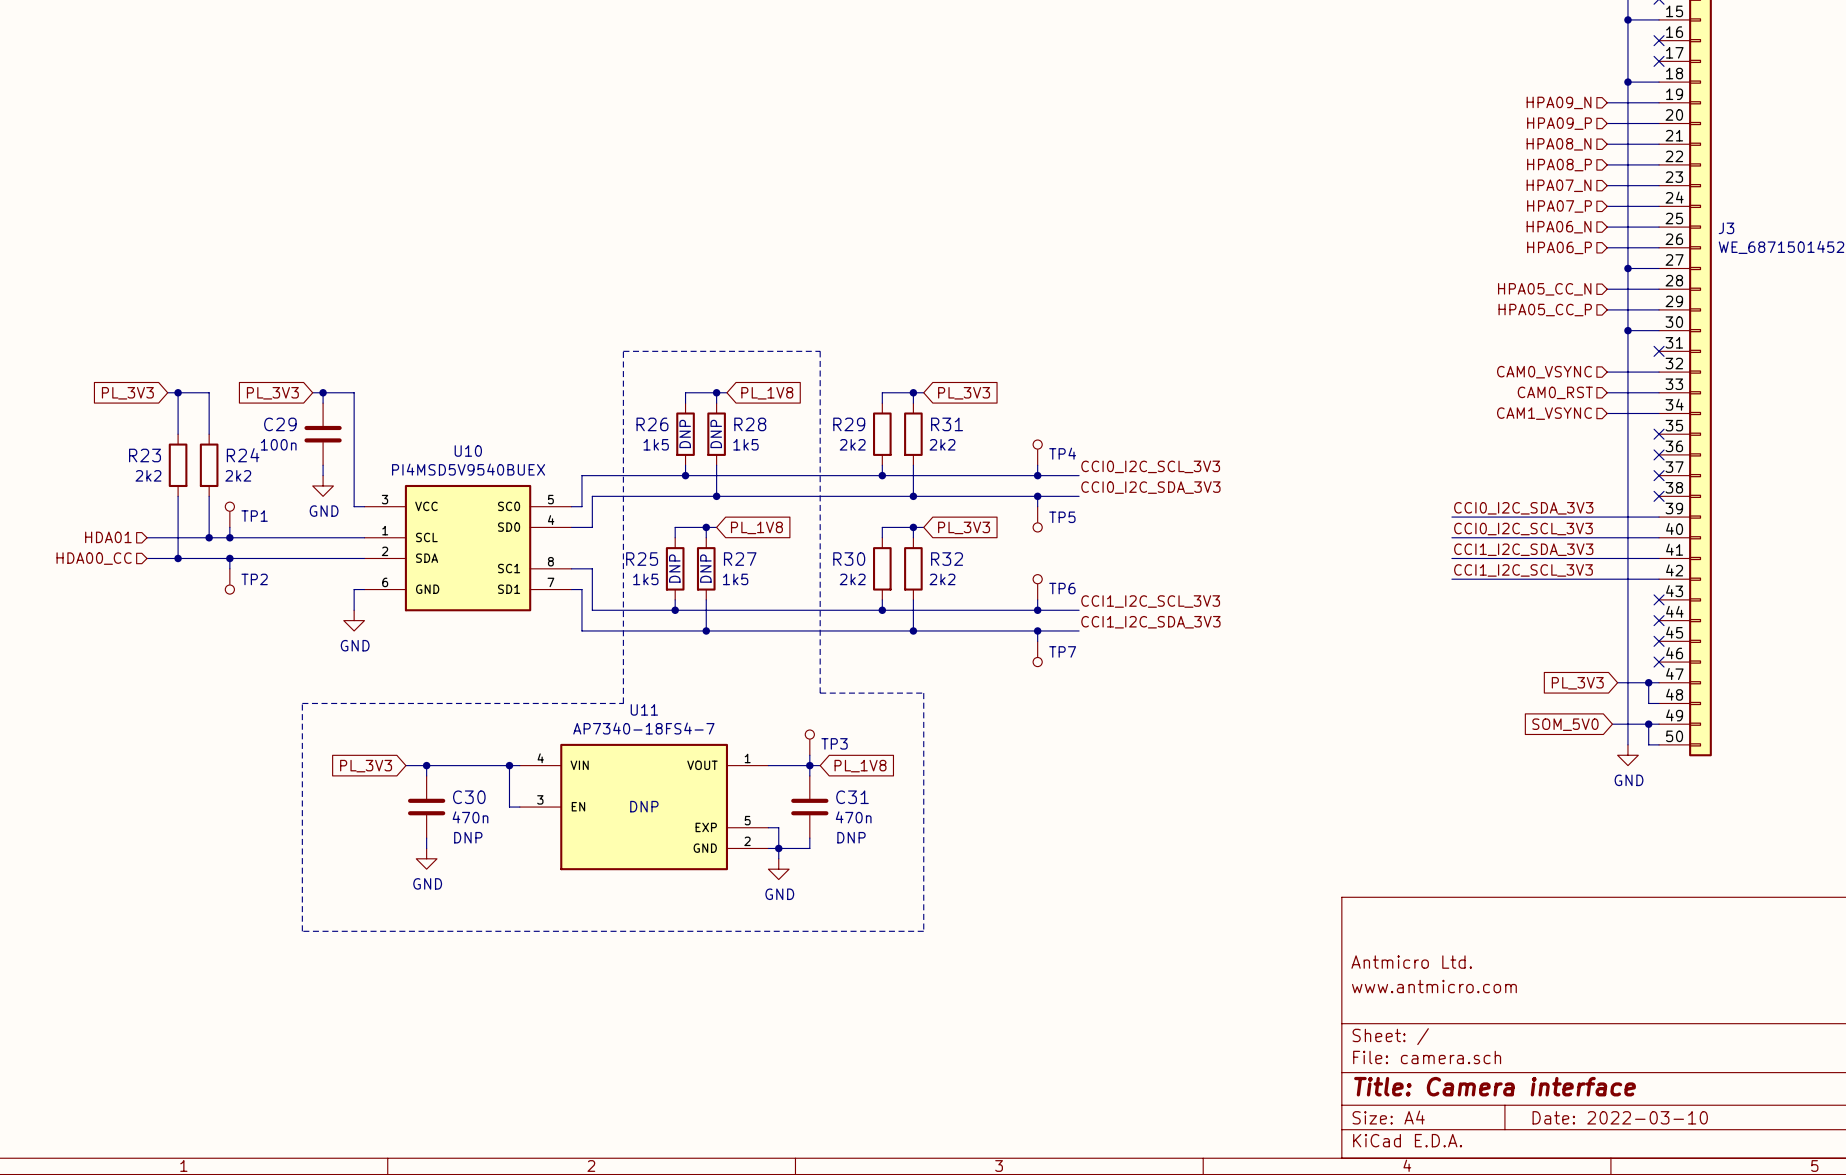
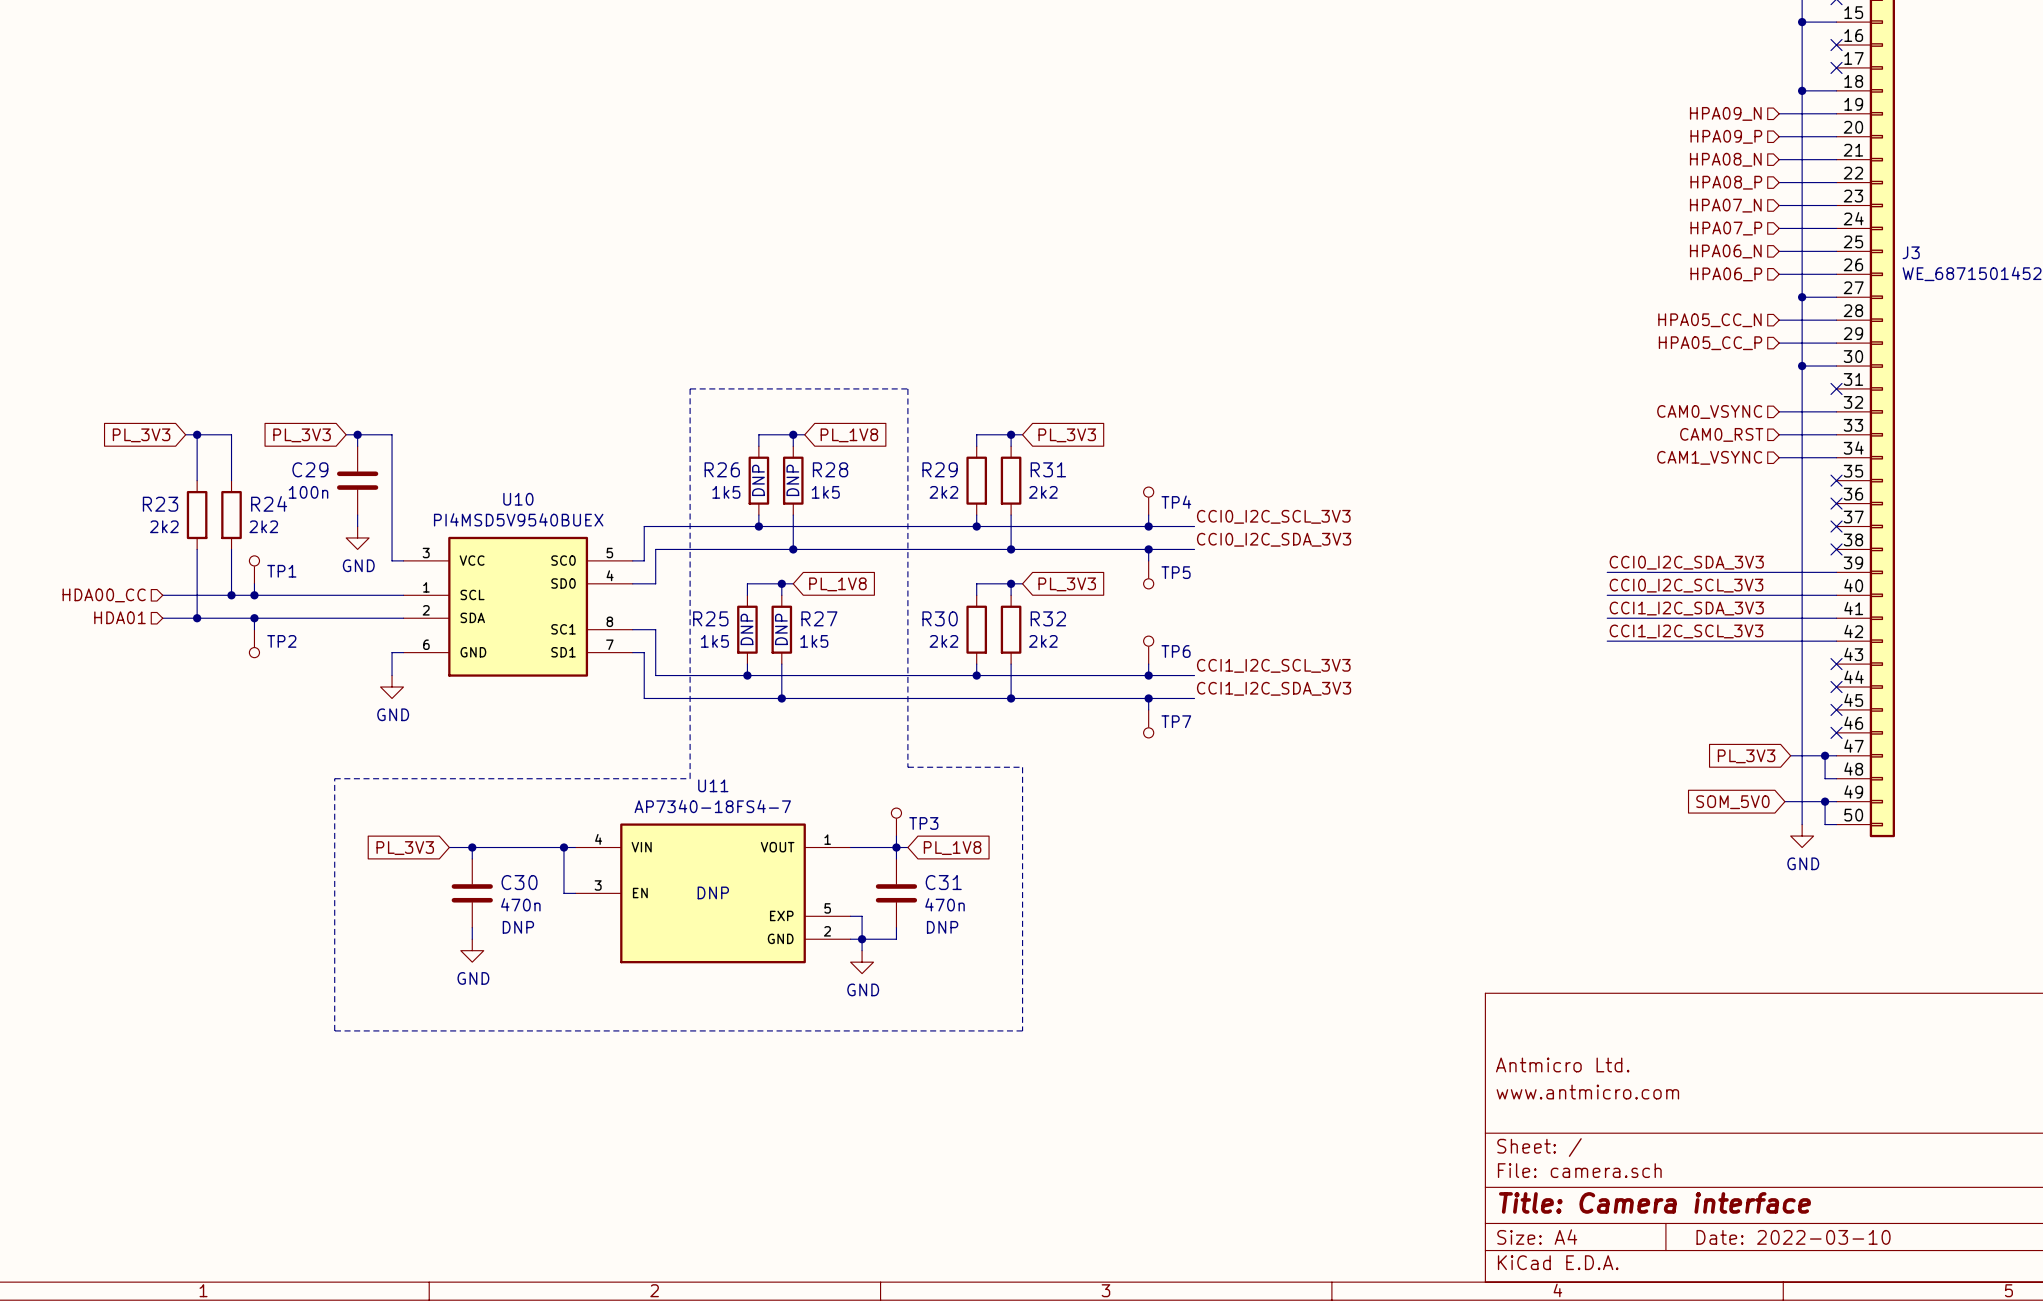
hierarchical label: HDA01 (108, 537) -> HDA00_CC (104, 595)
hierarchical label: HDA00_CC (94, 558) -> HDA01 (119, 617)

